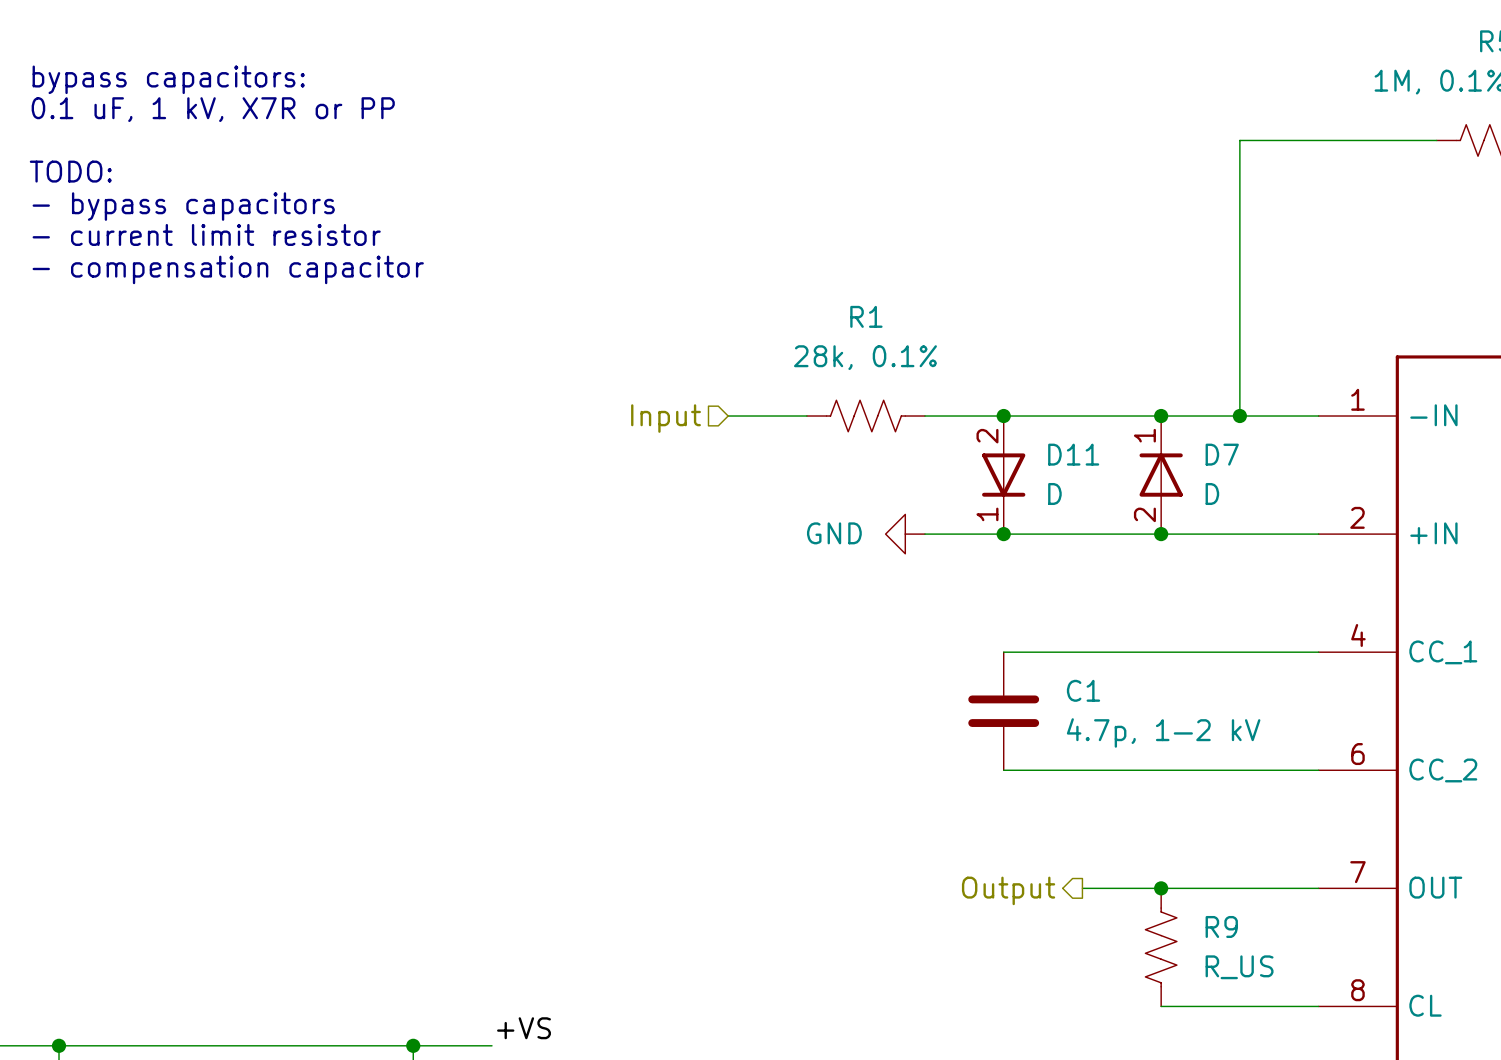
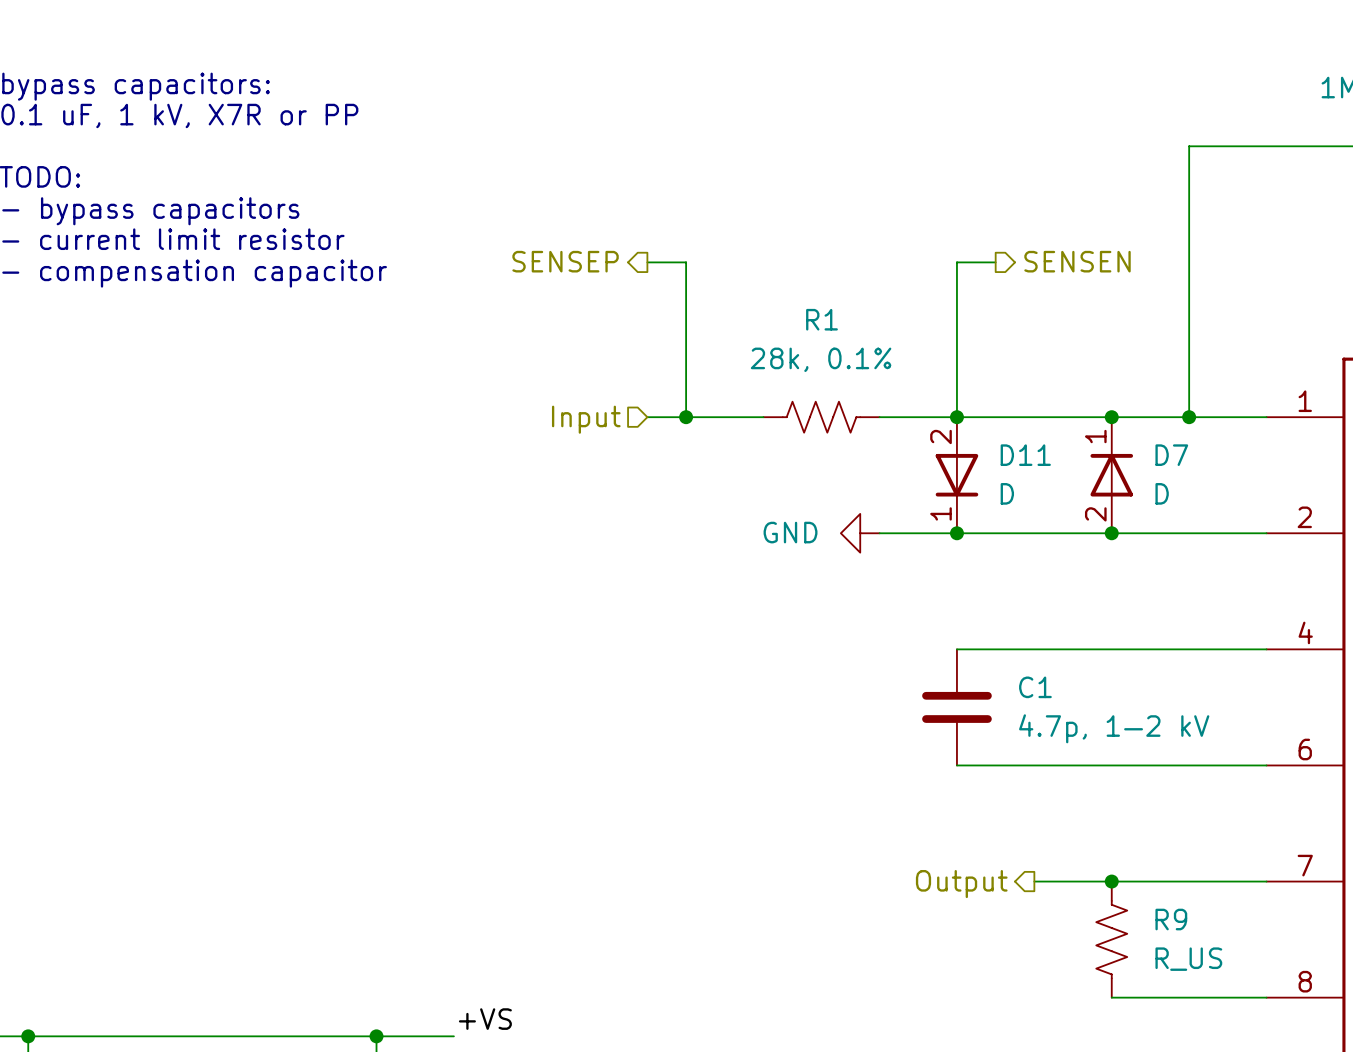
hierarchical label: none -> SENSEP (565, 261)
hierarchical label: none -> SENSEN (1077, 261)
wire: none -> (647, 262) (686, 262) (686, 417) (647, 417)
wire: none -> (995, 262) (956, 262) (956, 417)
junction: none -> (686, 417)
hierarchical label position: Input (666, 418) -> Input (586, 419)

